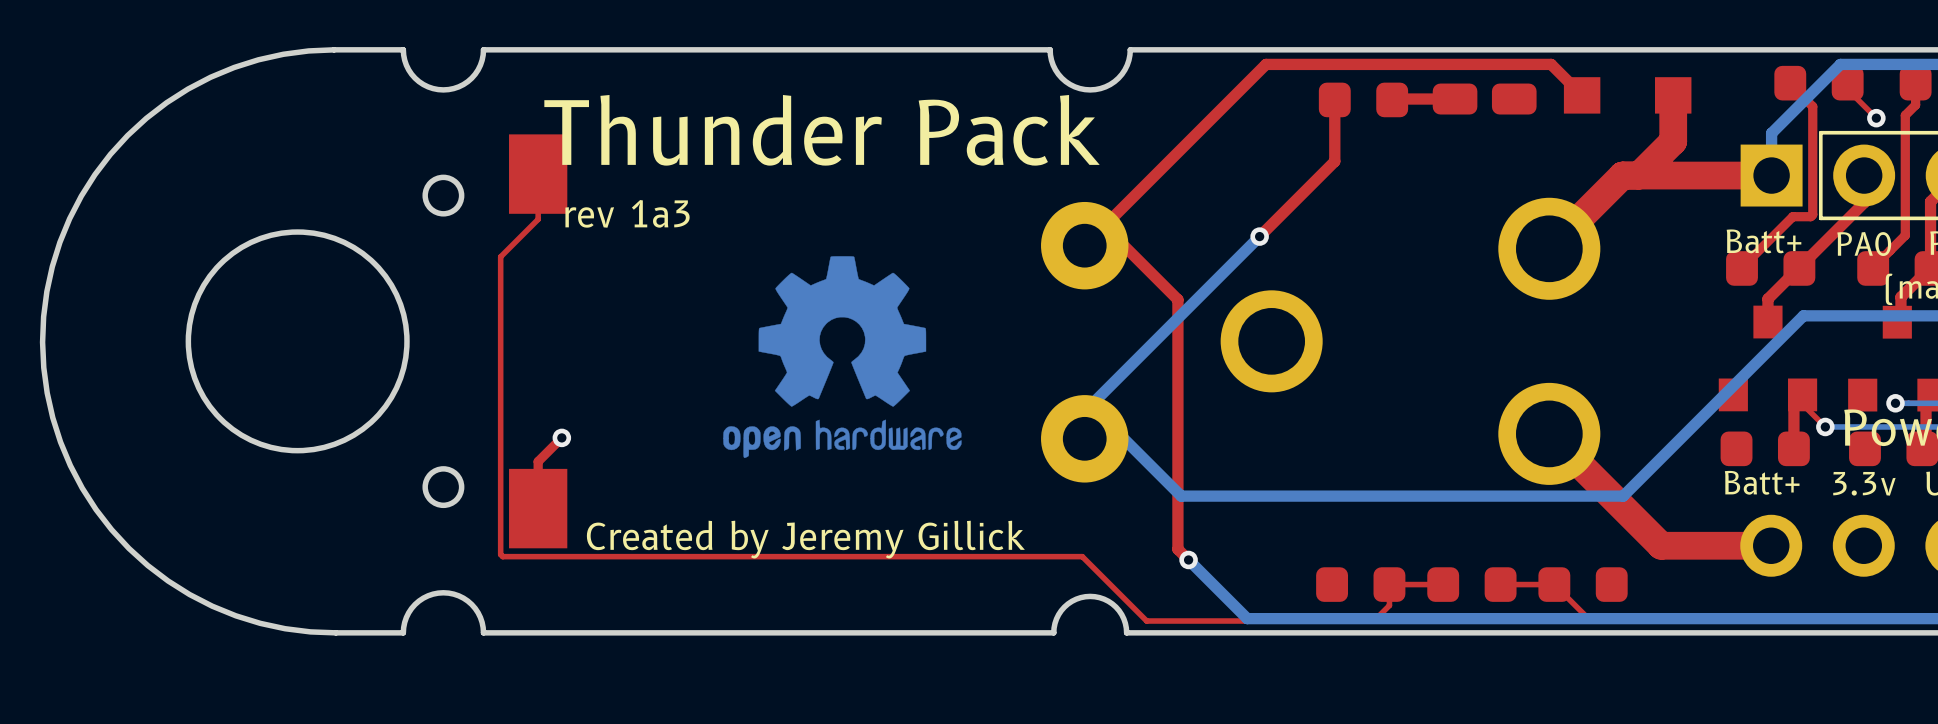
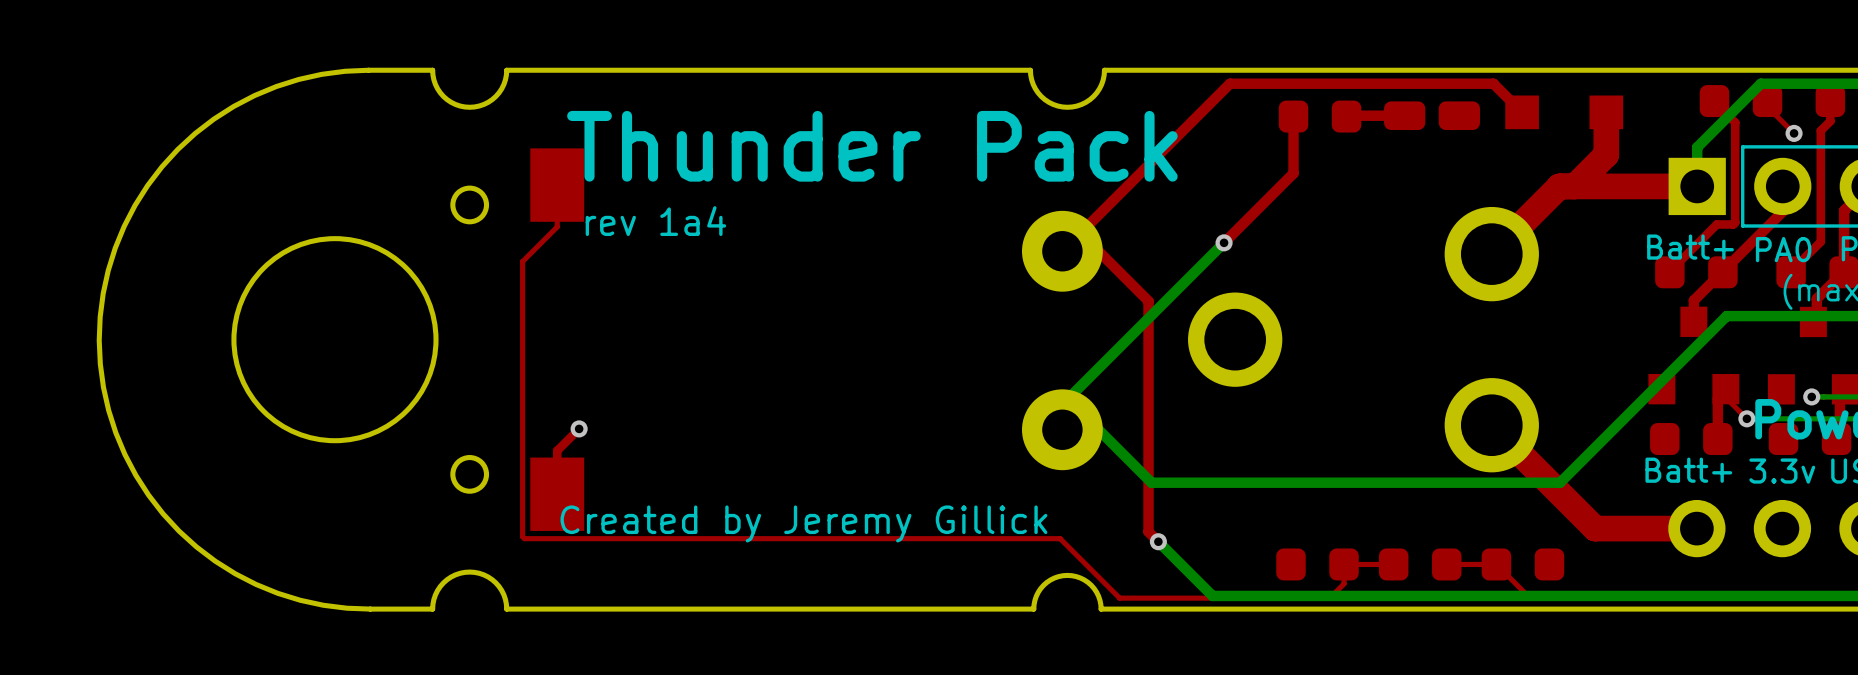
text: rev 1a3 (627, 213) -> rev 1a4 (655, 221)
drawing: [723, 256, 962, 458] -> none

